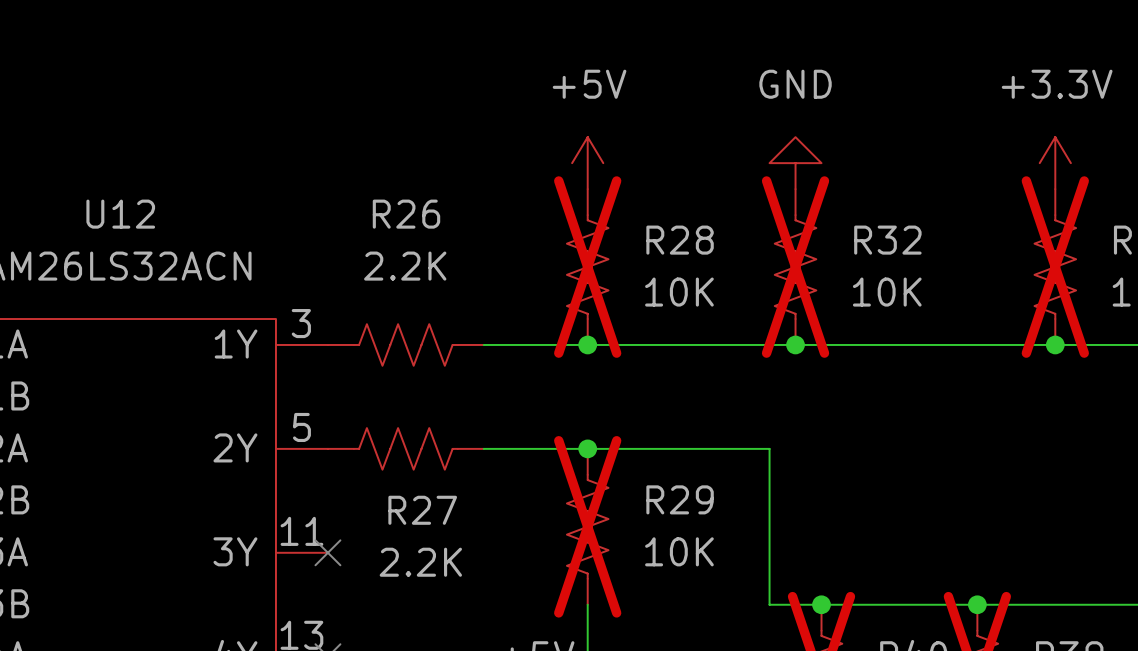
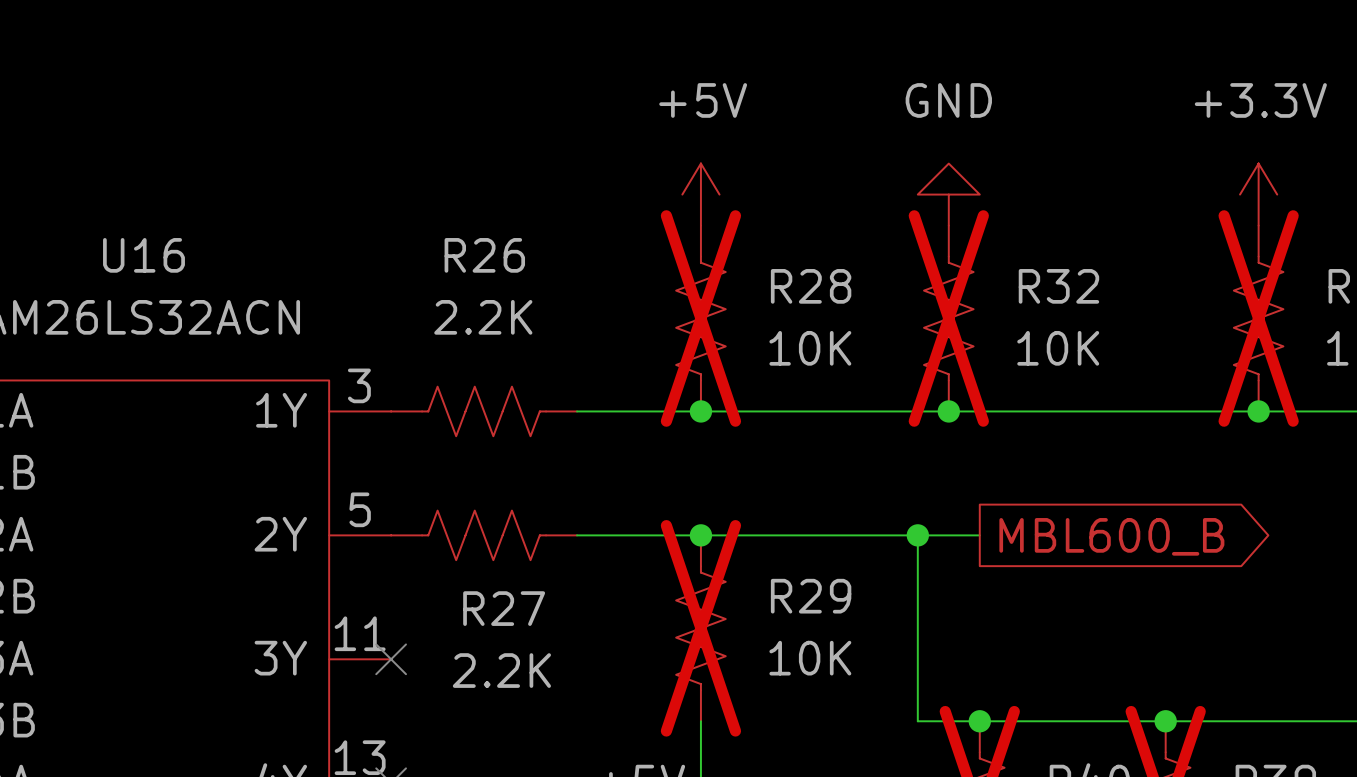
U12 name: U12 (120, 214) -> U16 (143, 255)
wire: none -> (917, 535) (979, 535)
junction: none -> (917, 535)
global label: none -> MBL600_B (1111, 536)

